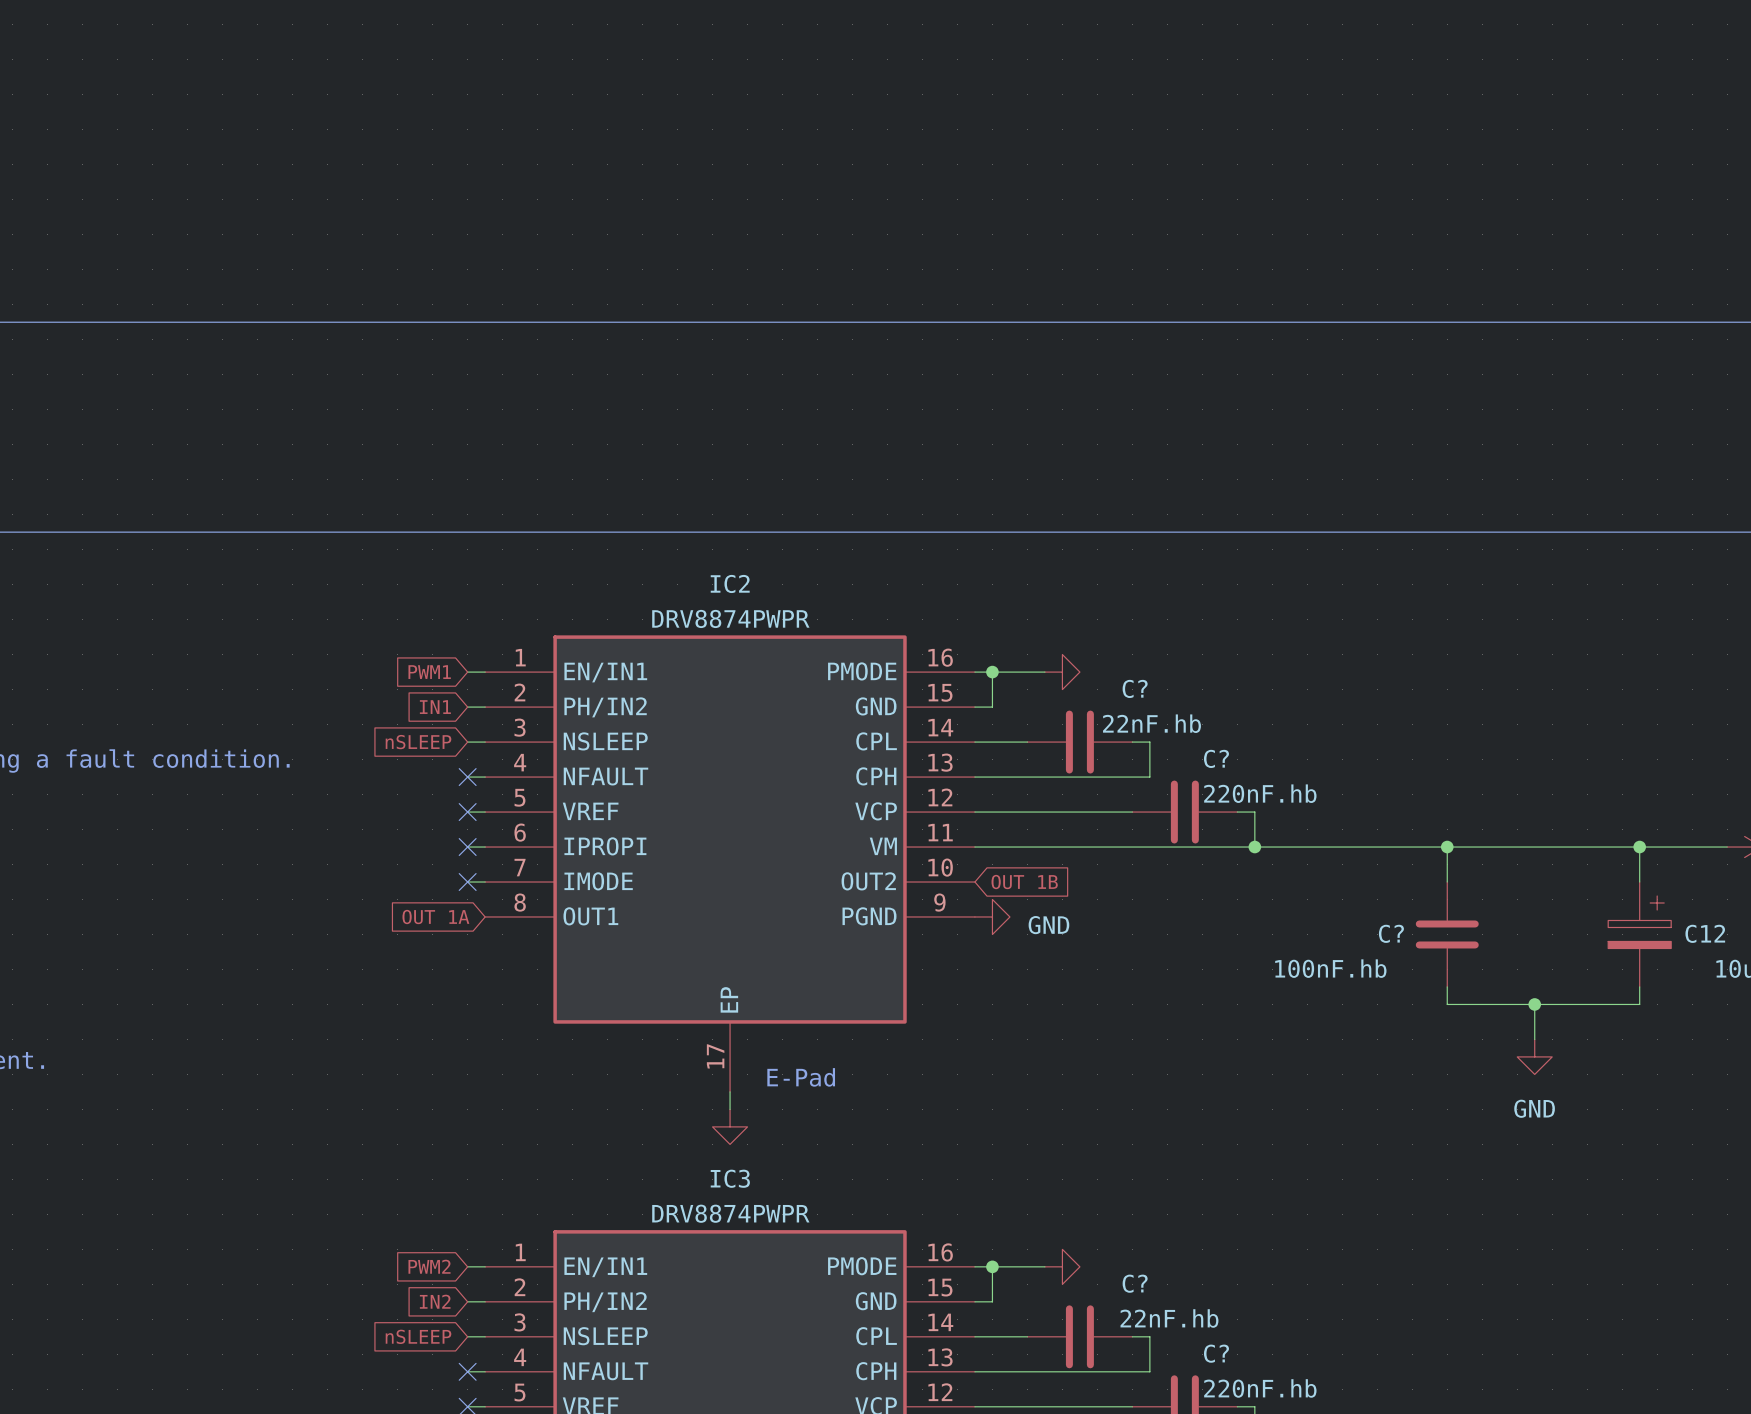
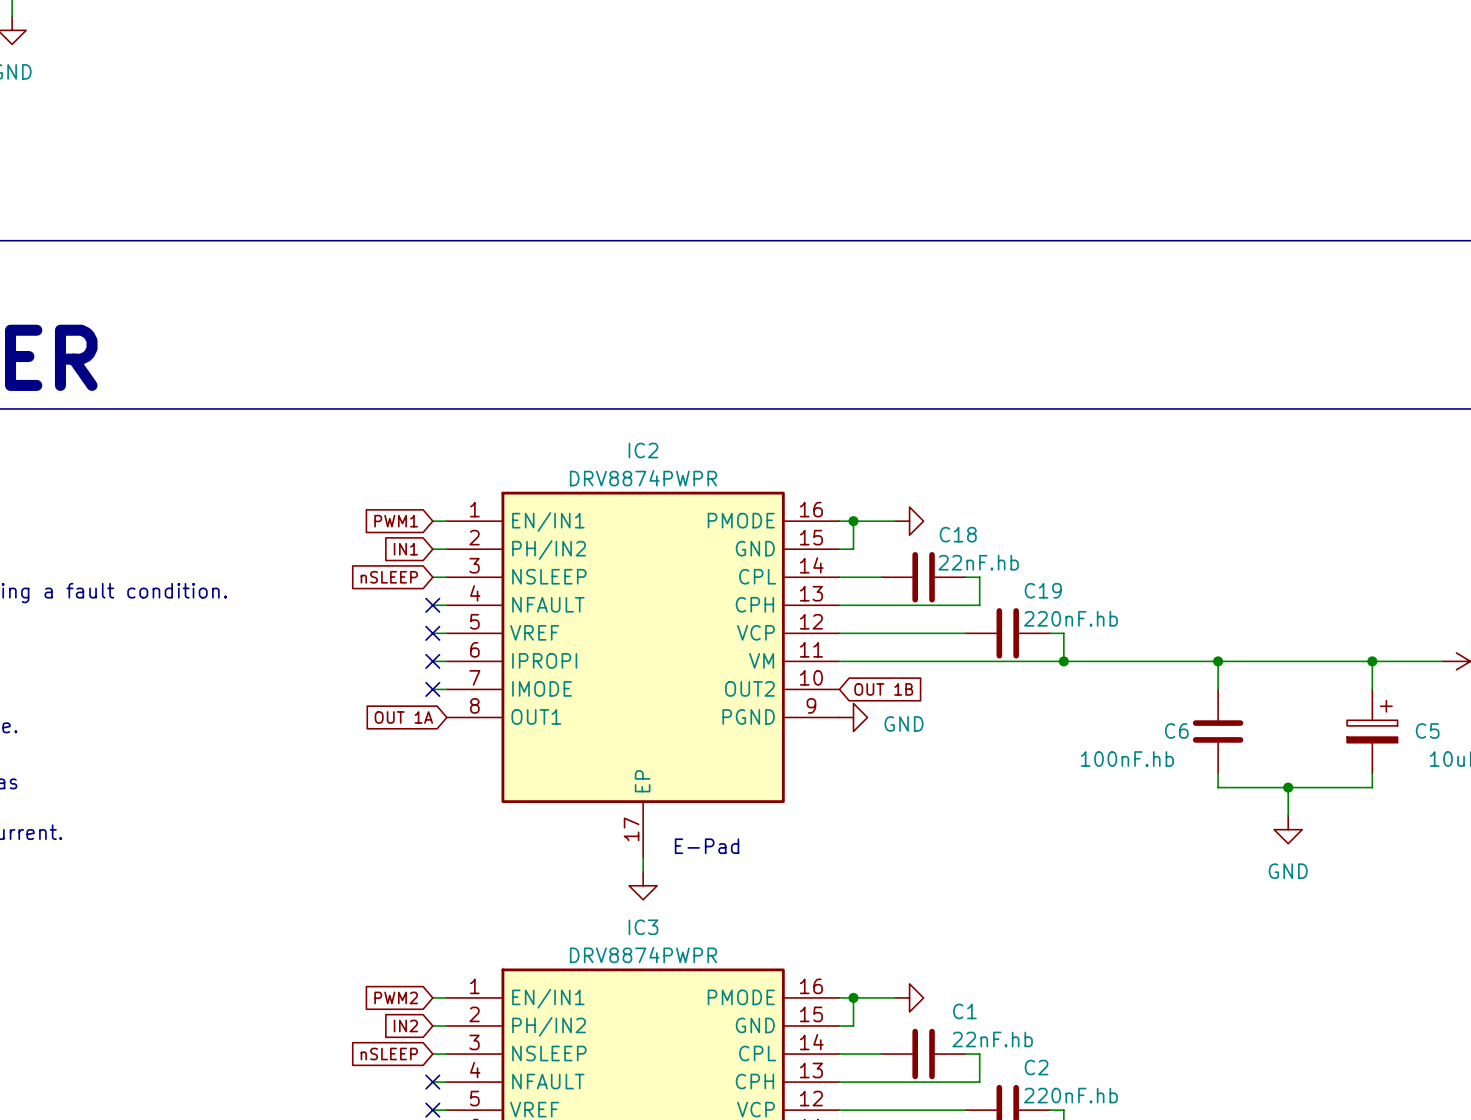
C? name: C? (1135, 688) -> C18 (958, 534)
C? name: C? (1216, 758) -> C19 (1043, 590)
C? name: C? (1391, 933) -> C6 (1176, 730)
C12 name: C12 (1705, 933) -> C5 (1427, 730)
C? name: C? (1135, 1283) -> C1 (964, 1011)
C? name: C? (1216, 1353) -> C2 (1036, 1067)

